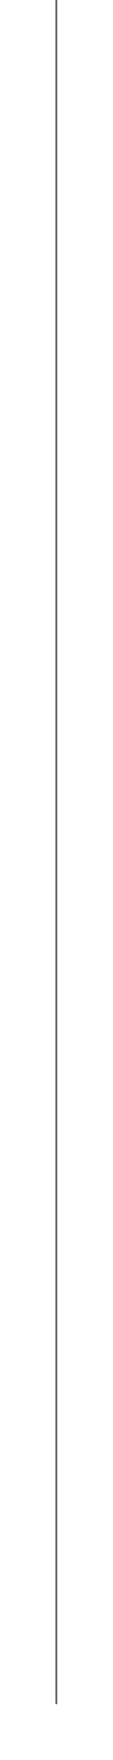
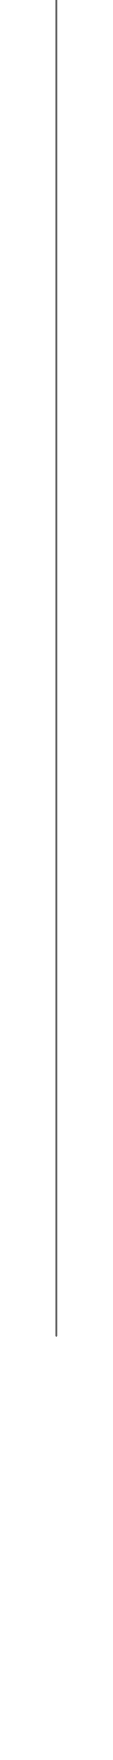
line: (56, 1335) (56, 1703) -> none

